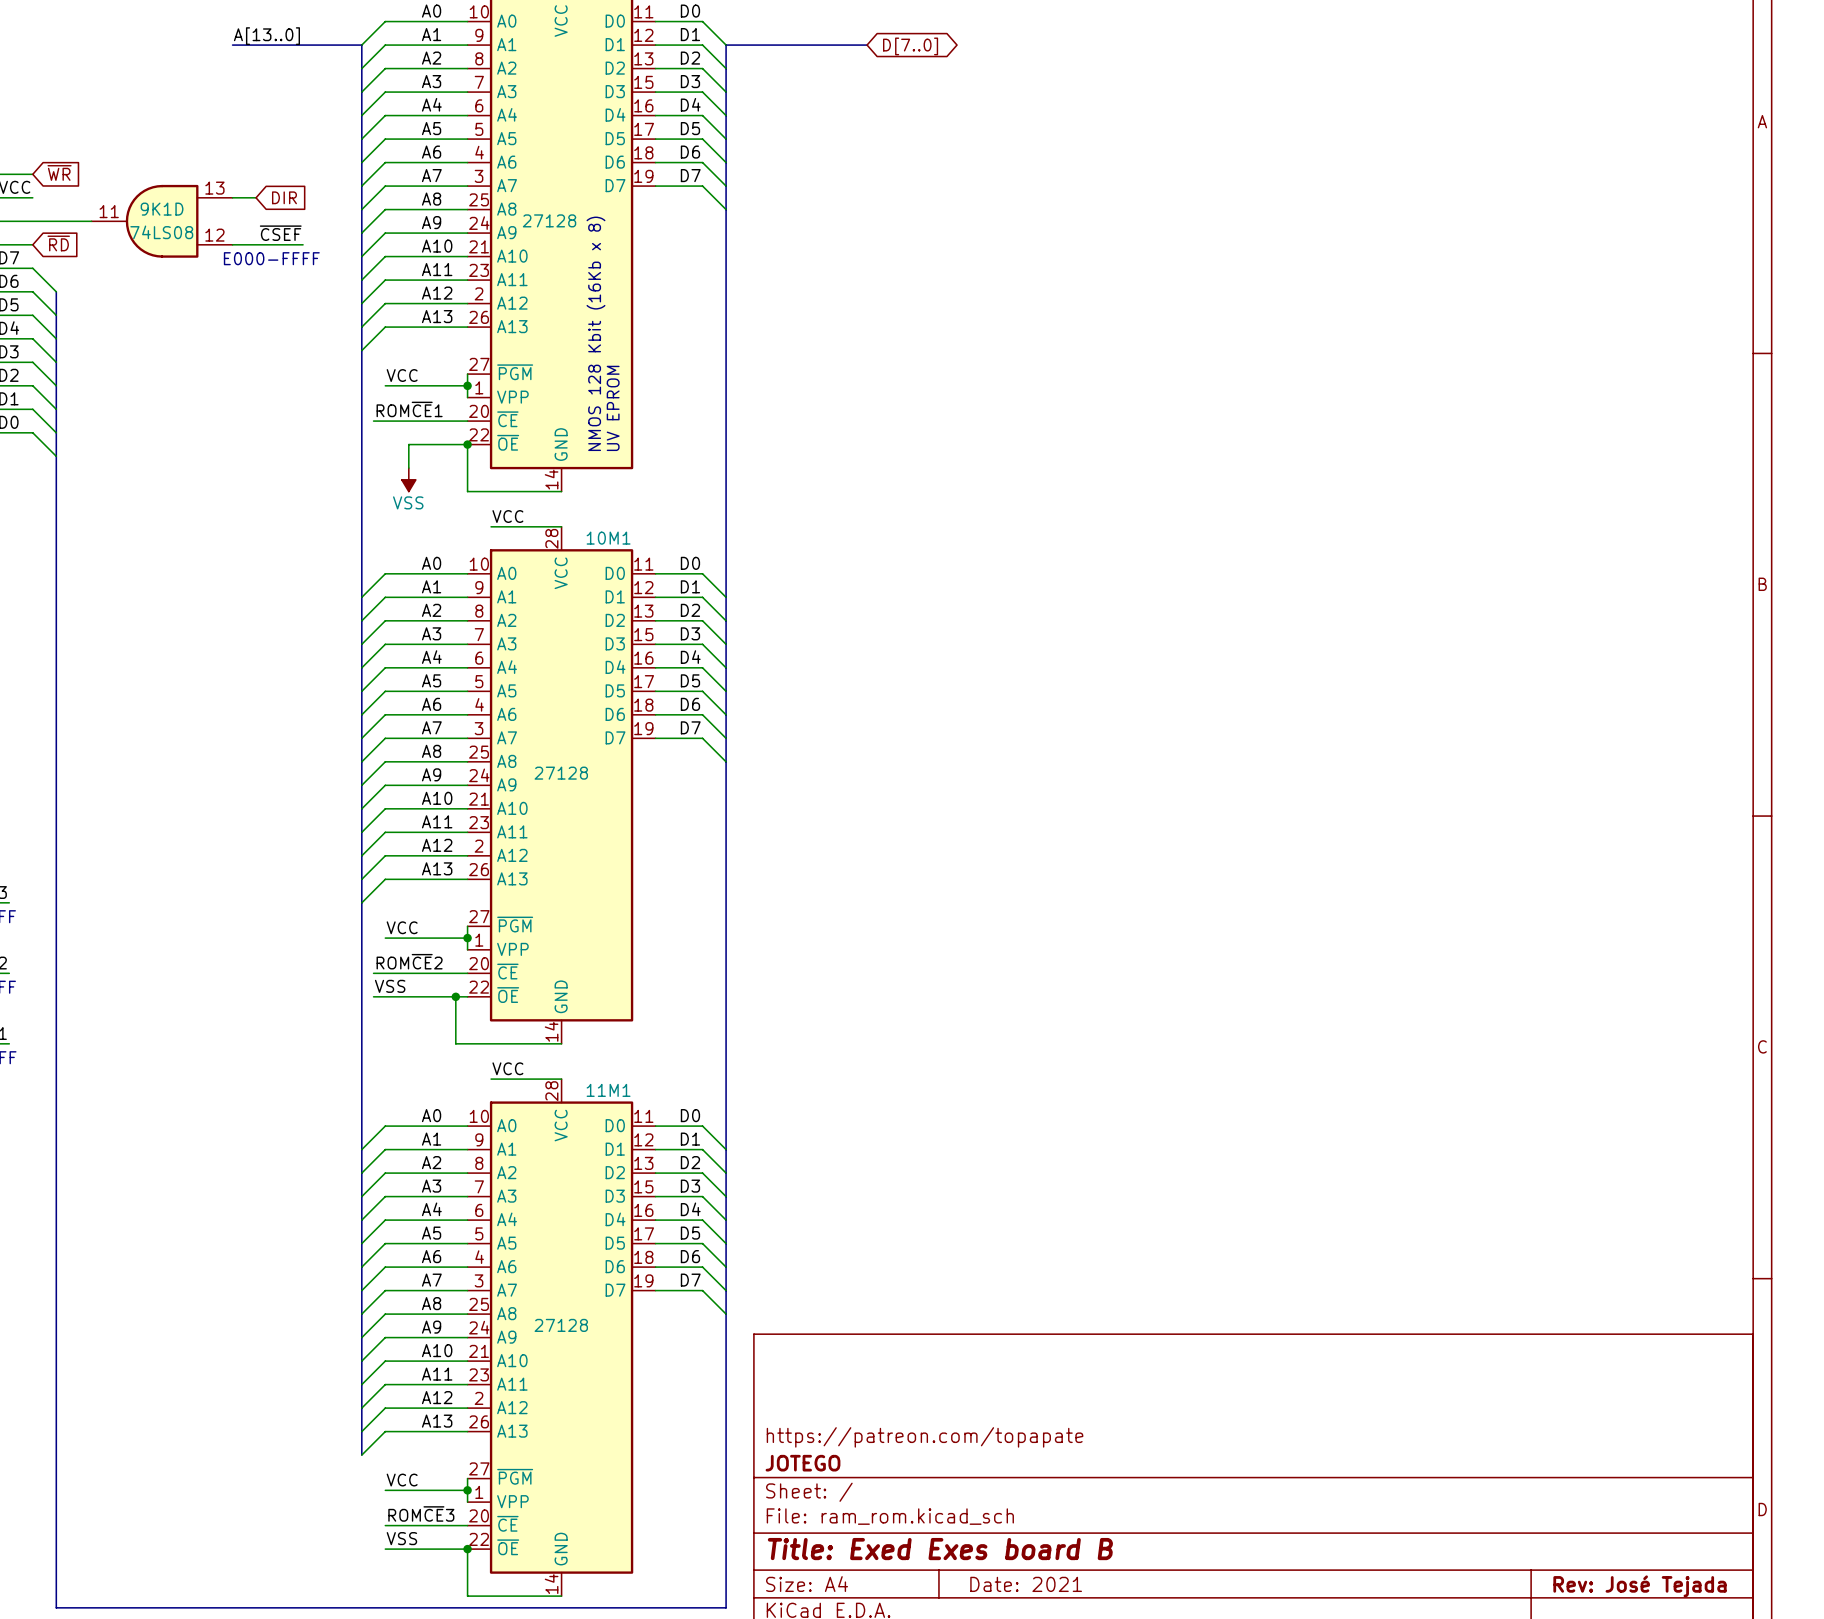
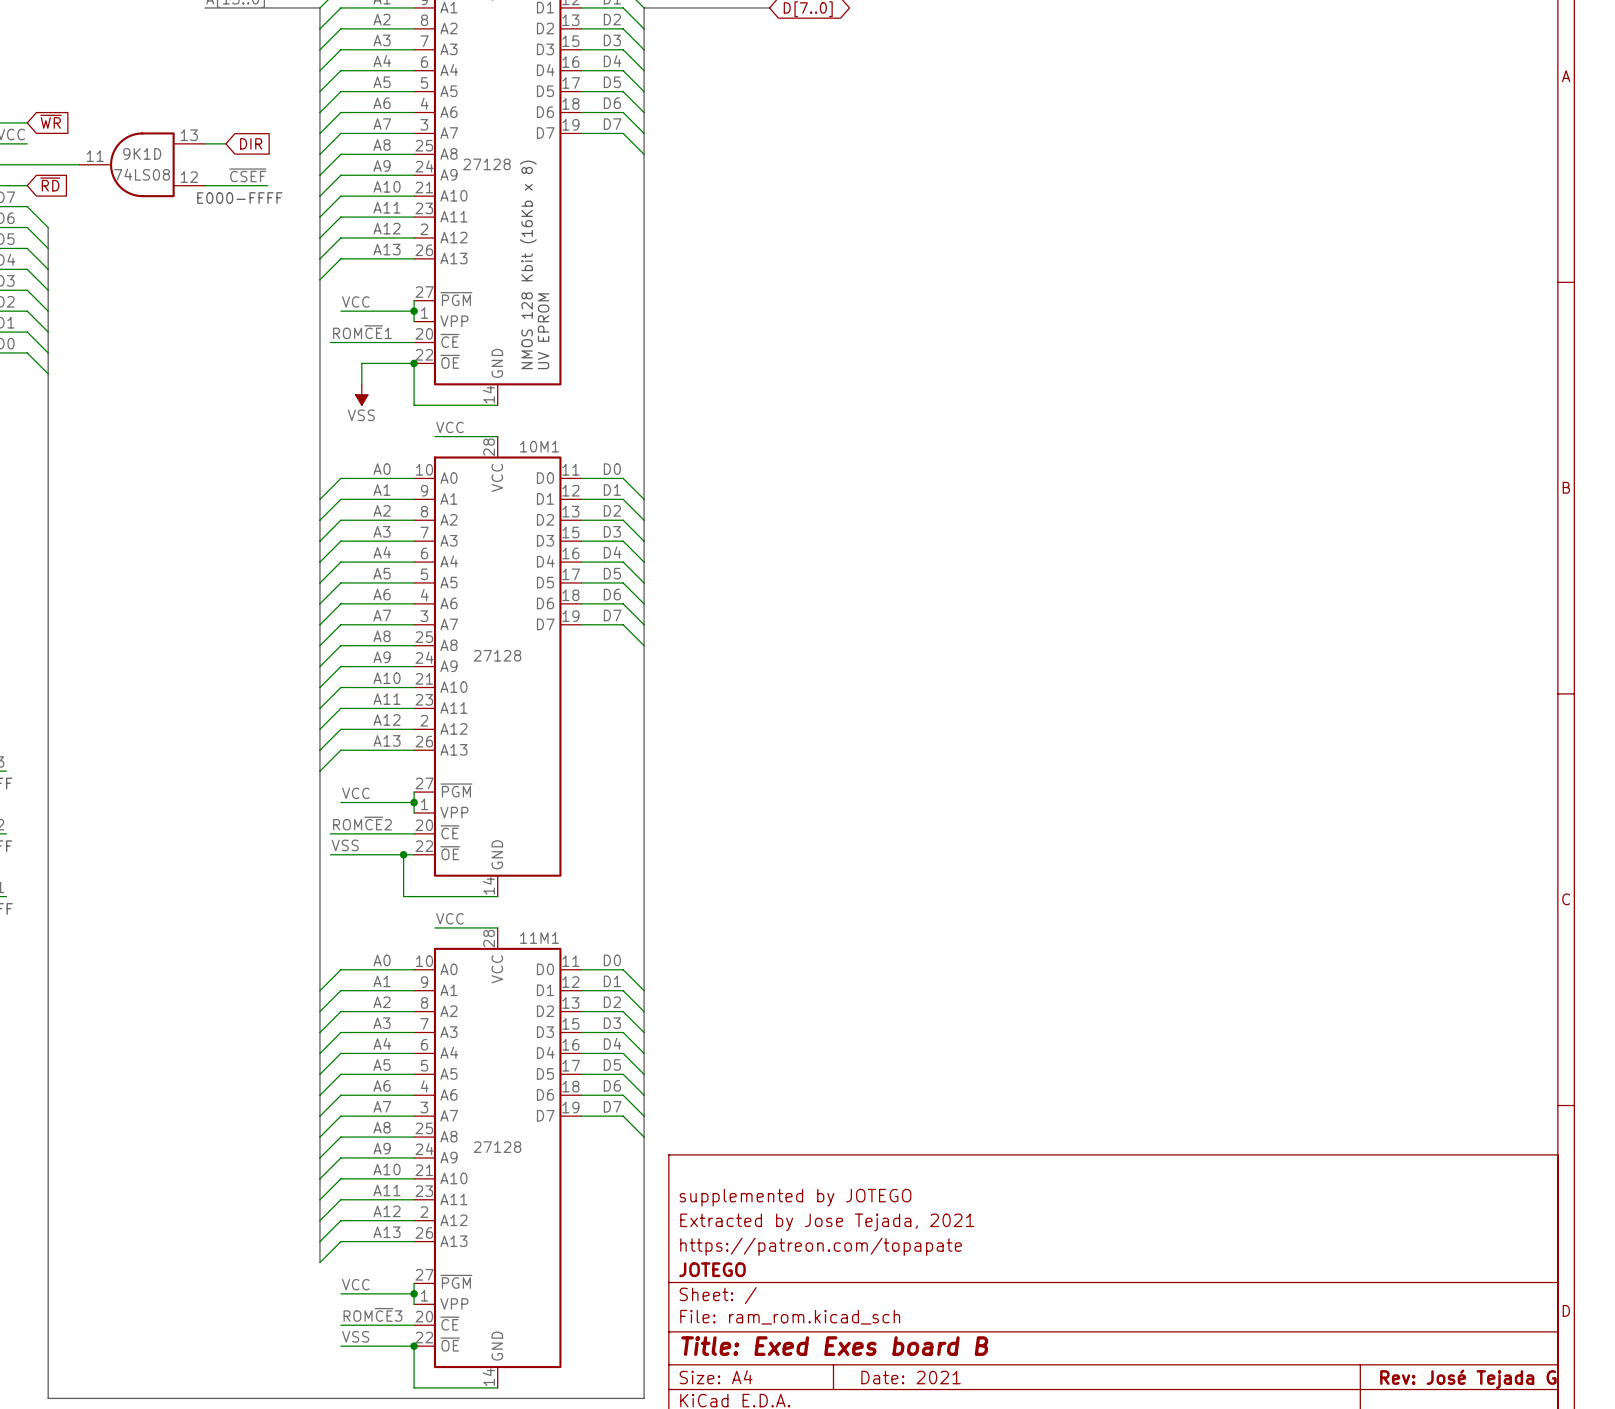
title block: none -> supplemented by JOTEGO (795, 1197)
title block: none -> Extracted by Jose Tejada, 2021 (827, 1222)
title block: Rev: José Tejada (1639, 1586) -> Rev: José Tejada G (1468, 1379)

